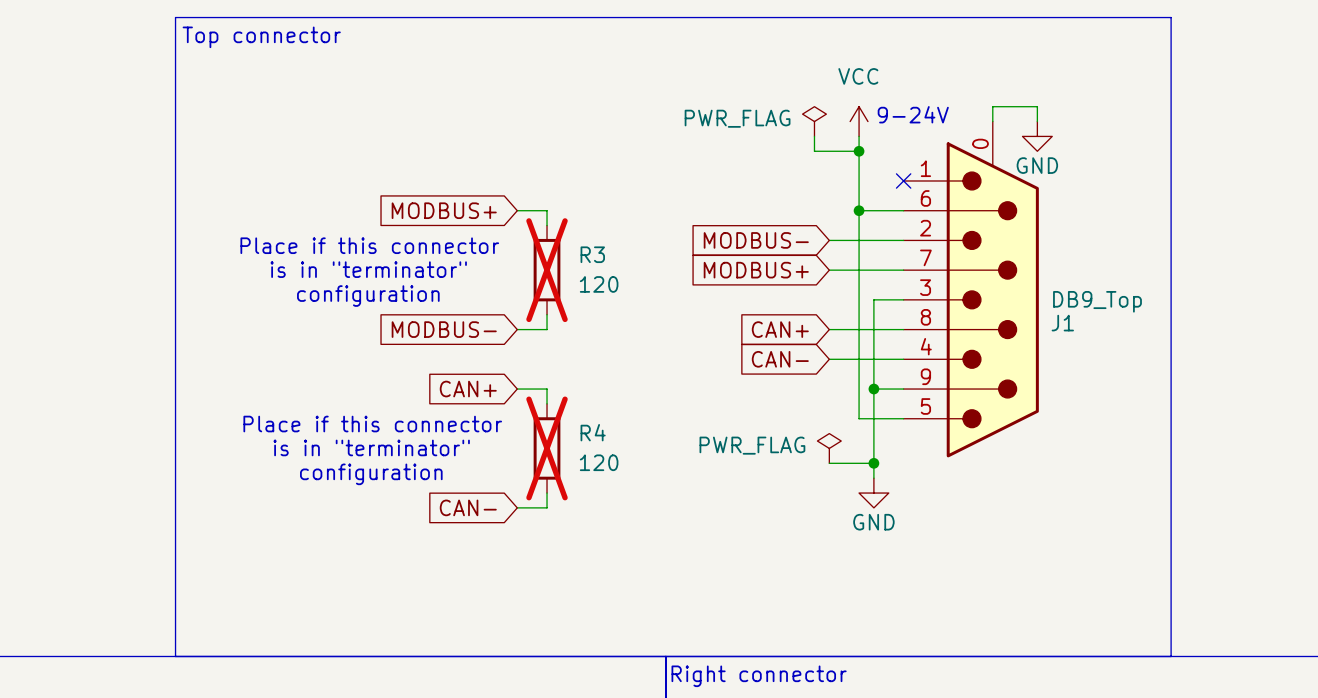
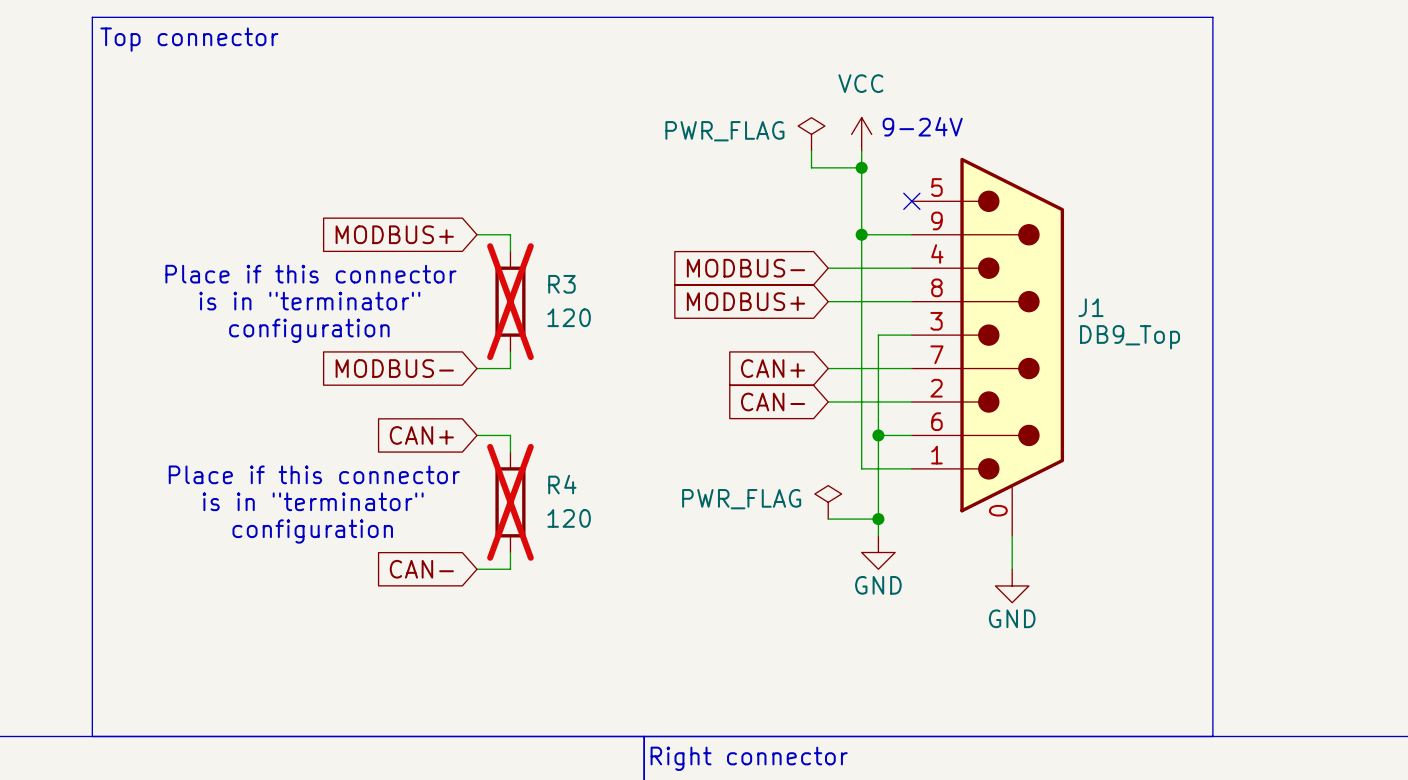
wire: (992, 121) (992, 106) (1037, 106) (1037, 121) -> none
power symbol: GND (1037, 136) -> none
J1 flip: as is (992, 299) -> up-down (1012, 335)
wire: none -> (1012, 535) (1012, 569)
power symbol: none -> GND (1012, 585)

